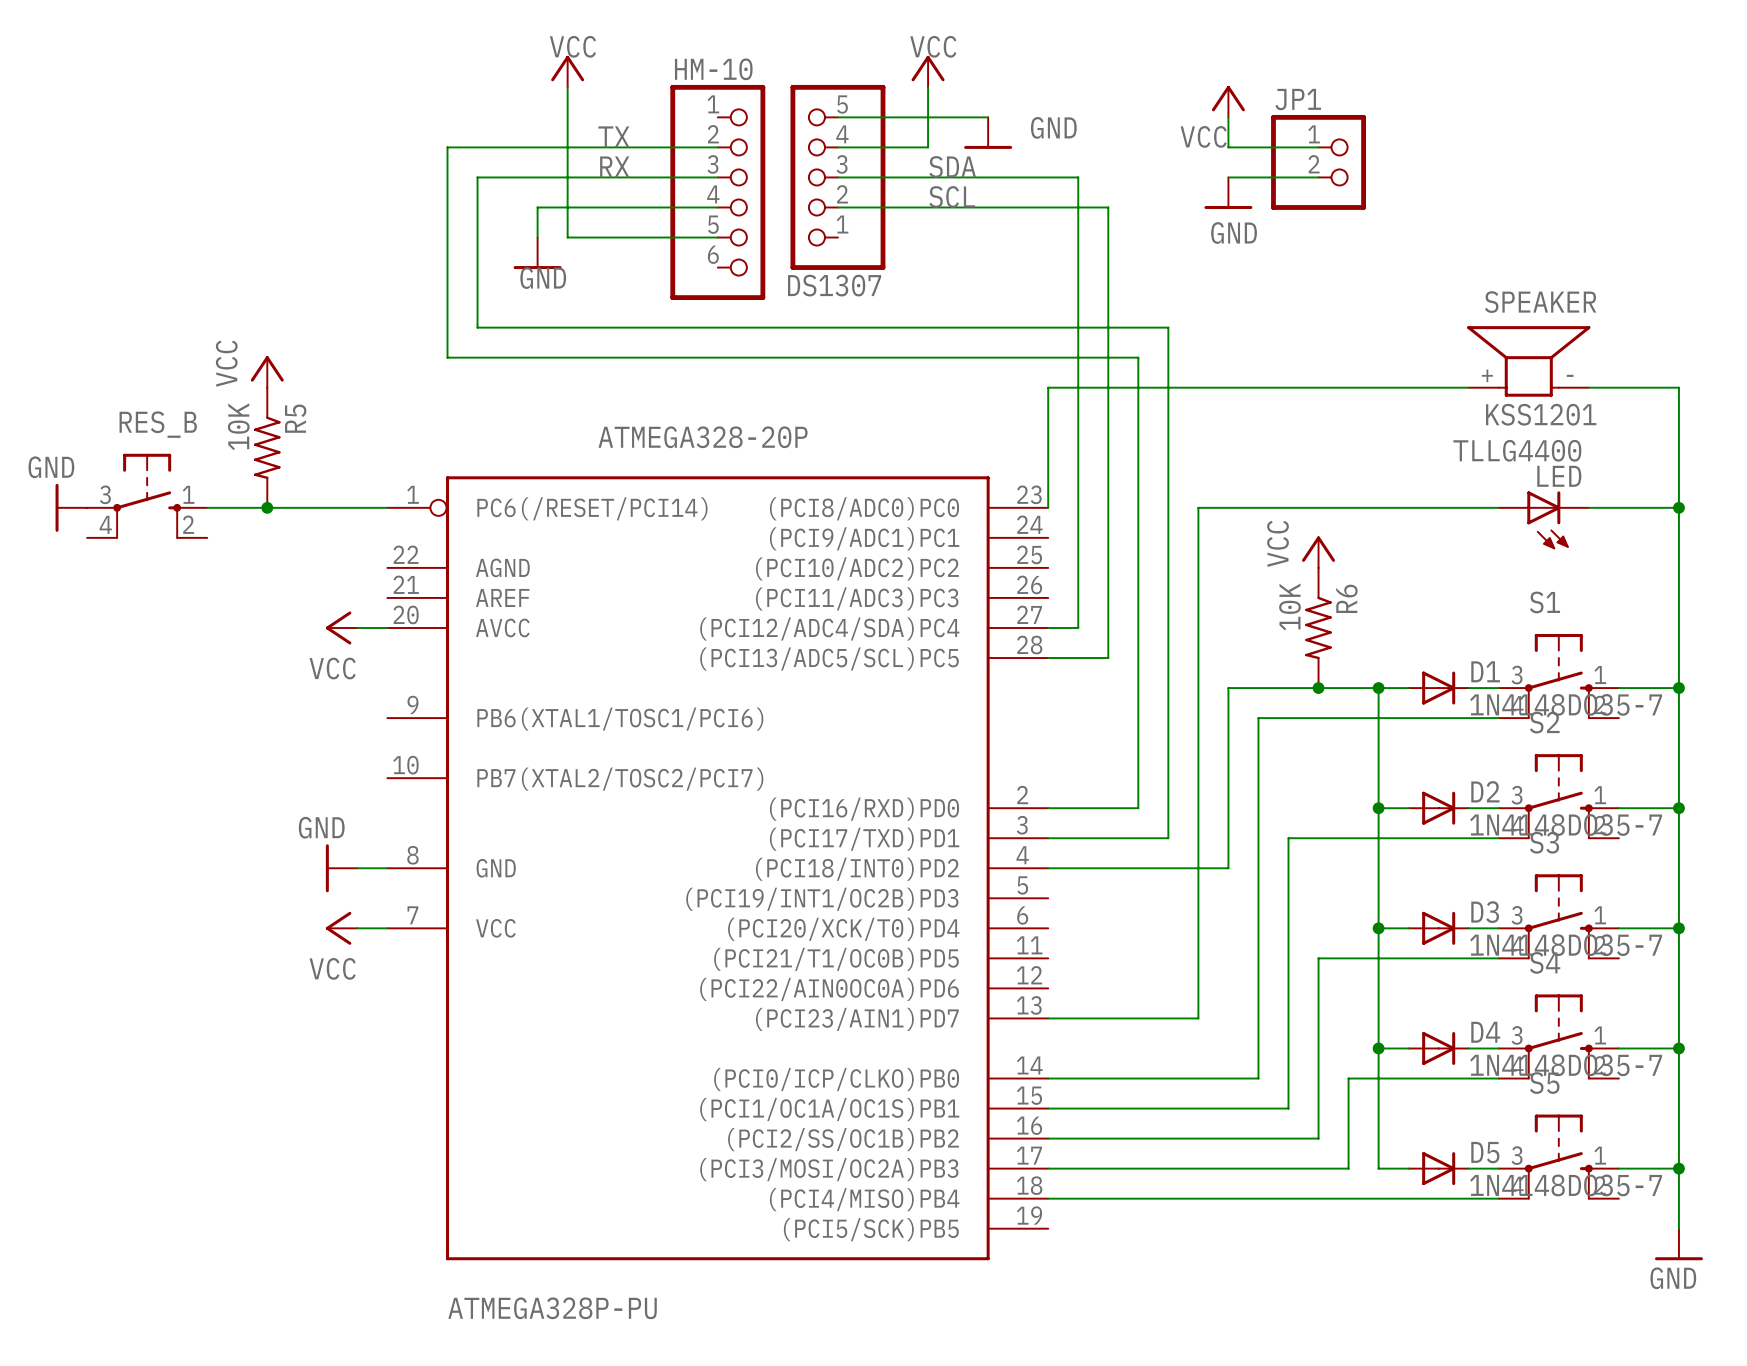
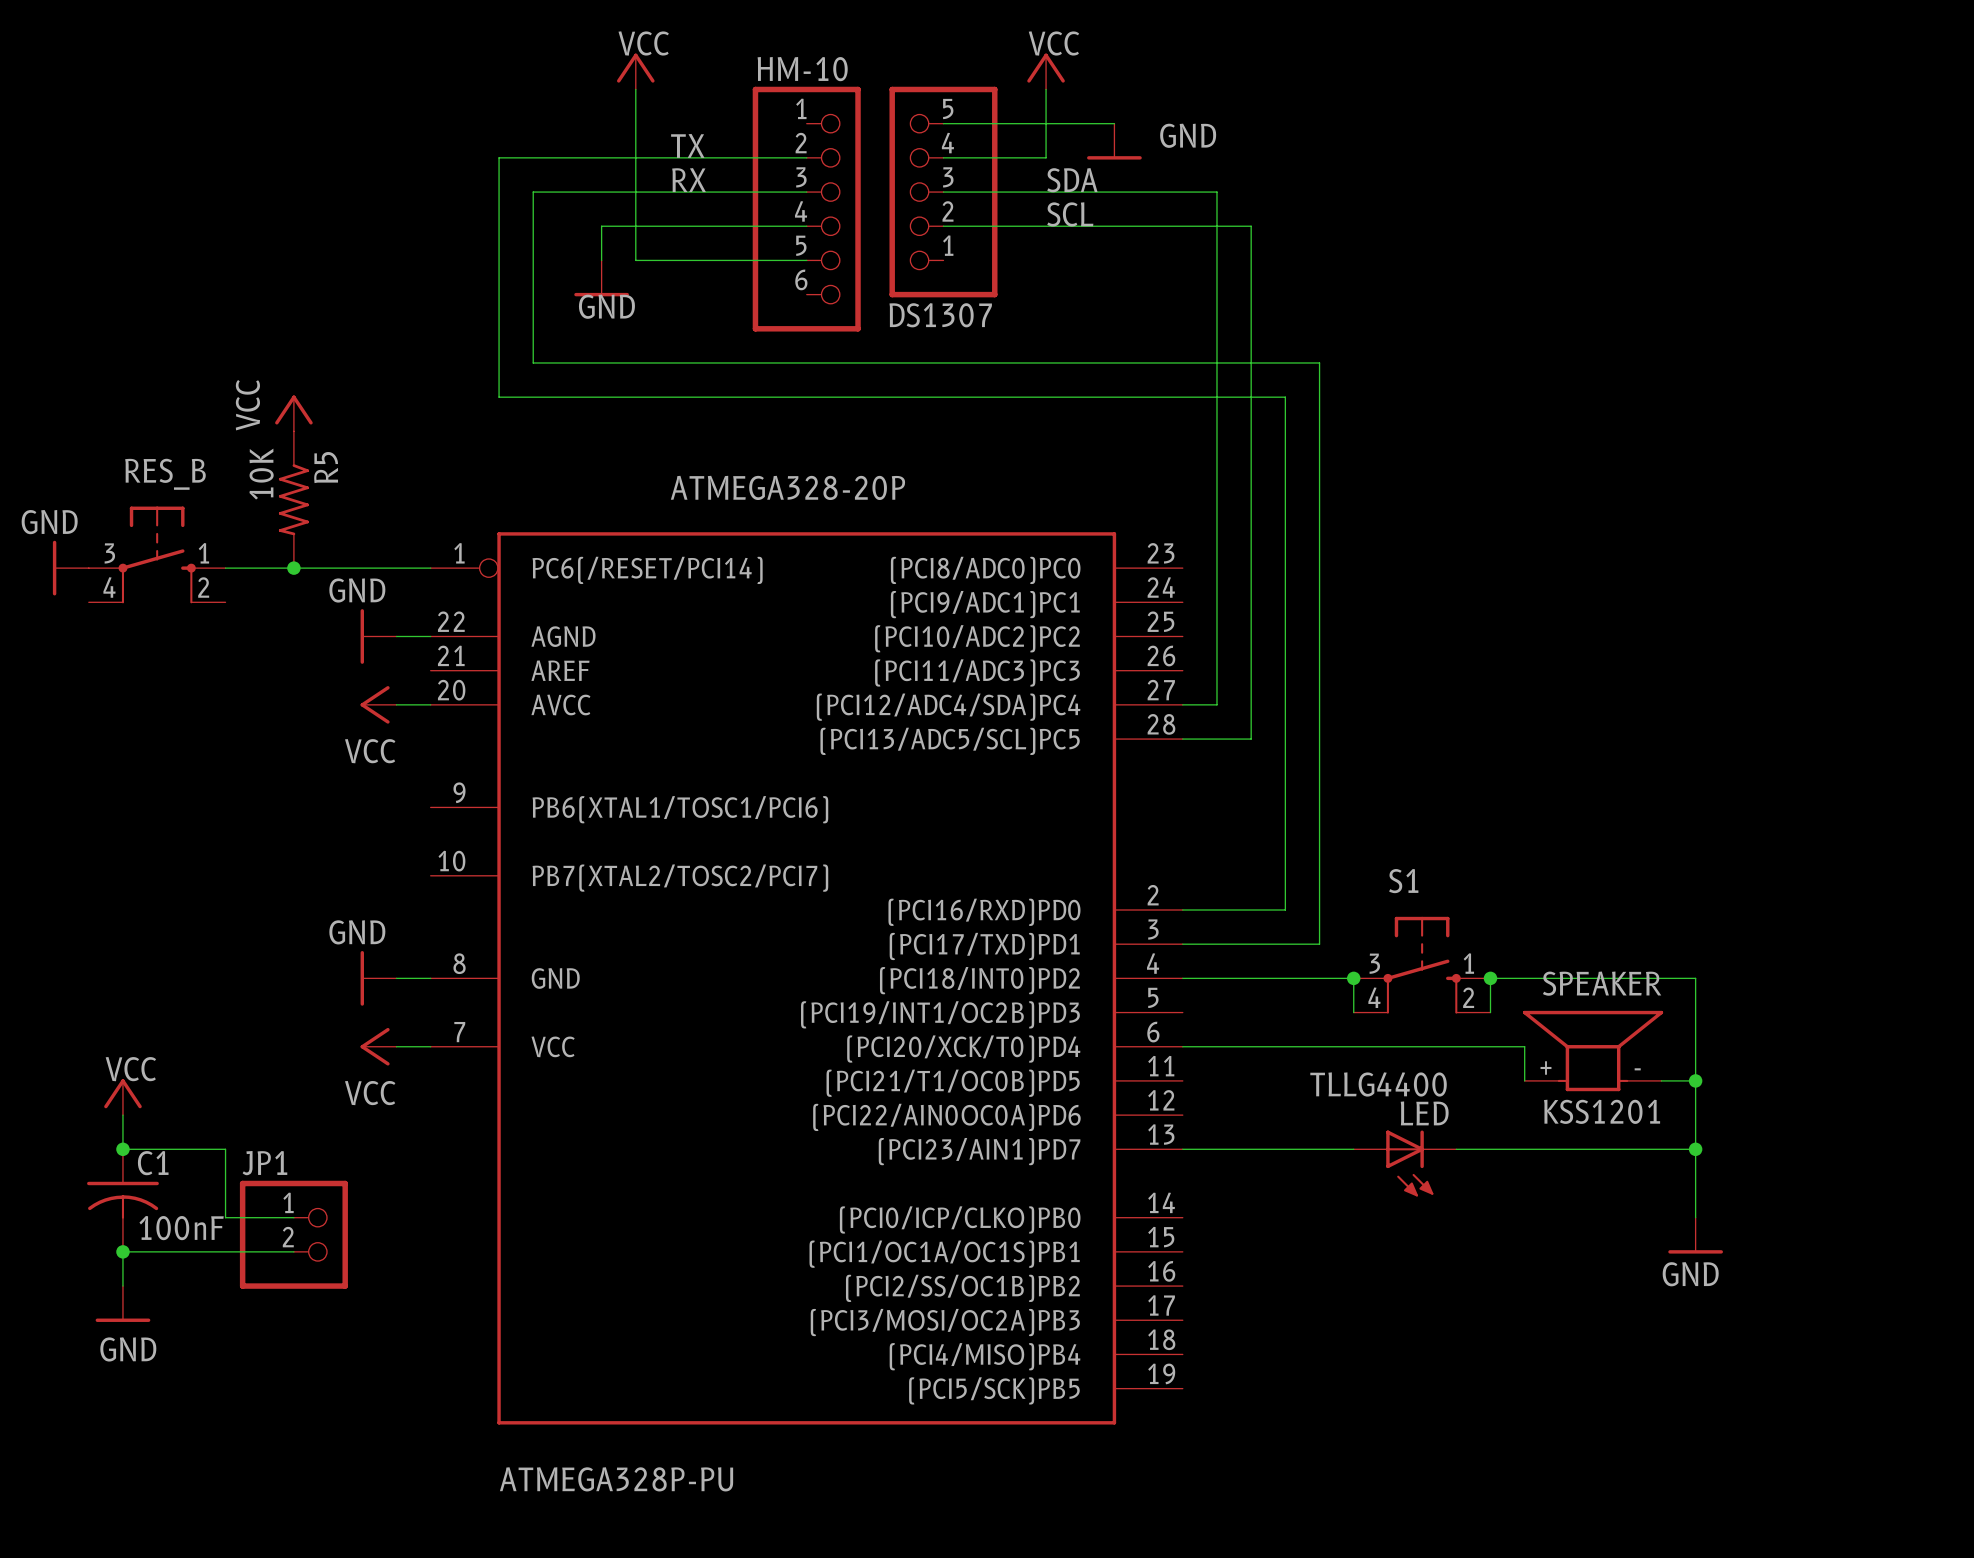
power symbol: VCC (1228, 101) -> none
wire: (1228, 117) (1228, 147) (1318, 147) -> none
JP1 position: (1318, 162) -> (293, 1234)
wire: (1228, 177) (1318, 177) -> none
power symbol: GND (1228, 193) -> none
SPEAKER: KSS1201 (1528, 361) -> none
wire: (1468, 387) (1048, 387) (1048, 507) -> none
wire: (1588, 387) (1678, 387) (1678, 1228) -> none
wire: (1498, 507) (1198, 507) (1198, 868) (1228, 868) (1228, 688) (1408, 688) -> none
wire: (1588, 507) (1678, 507) -> none
junction: (1678, 507) -> none
LED: TLLG4400 (1543, 520) -> none
power symbol: VCC (1318, 552) -> none
power symbol: none -> GND (378, 636)
wire: none -> (396, 636) (430, 636)
R6: 10K (1318, 627) -> none
S1 position: (1558, 676) -> (1422, 965)
junction: (1318, 688) -> none
wire: (1378, 688) (1378, 1168) (1408, 1168) -> none
junction: (1378, 688) -> none
D1: 1N4148DO35-7 (1438, 688) -> none
wire: (1468, 688) (1498, 688) -> none
wire: (1618, 688) (1678, 688) -> none
junction: (1678, 688) -> none
wire: (1498, 718) (1258, 718) (1258, 1078) (1048, 1078) -> none
S2: (1558, 796) -> none
wire: (1378, 808) (1408, 808) -> none
junction: (1378, 808) -> none
D2: 1N4148DO35-7 (1438, 808) -> none
wire: (1468, 808) (1498, 808) -> none
wire: (1618, 808) (1678, 808) -> none
junction: (1678, 808) -> none
wire: (1498, 838) (1288, 838) (1288, 1108) (1048, 1108) -> none
junction: none -> (1353, 978)
junction: none -> (1490, 978)
wire: (1198, 898) (1198, 1018) -> none
S3: (1558, 916) -> none
wire: none -> (1182, 1046) (1524, 1046) (1524, 1080)
junction: (1378, 928) -> none
D3: 1N4148DO35-7 (1438, 928) -> none
wire: (1468, 928) (1498, 928) -> none
wire: (1618, 928) (1678, 928) -> none
junction: (1678, 928) -> none
SPEAKER: none -> KSS1201 (1593, 1051)
wire: (1468, 958) (1318, 958) (1318, 1138) (1048, 1138) -> none
junction: none -> (1695, 1080)
power symbol: none -> VCC (122, 1097)
wire: none -> (122, 1115) (122, 1149) (225, 1149) (225, 1217) (293, 1217)
junction: none -> (122, 1149)
wire: none -> (1456, 1149) (1695, 1149)
junction: none -> (1695, 1149)
LED: none -> TLLG4400 (1405, 1163)
S4: (1558, 1036) -> none
wire: (1378, 1048) (1408, 1048) -> none
junction: (1378, 1048) -> none
D4: 1N4148DO35-7 (1438, 1048) -> none
wire: (1468, 1048) (1498, 1048) -> none
wire: (1618, 1048) (1678, 1048) -> none
junction: (1678, 1048) -> none
C1: none -> 100nF (122, 1200)
wire: (1498, 1078) (1348, 1078) (1348, 1168) (1048, 1168) -> (1695, 1217) (1695, 978) (1490, 978) (1490, 1012)
junction: none -> (122, 1251)
wire: none -> (293, 1251) (122, 1251) (122, 1286)
power symbol: none -> GND (122, 1304)
S5: (1558, 1157) -> none
D5: 1N4148DO35-7 (1438, 1168) -> none
wire: (1468, 1168) (1498, 1168) -> none
wire: (1618, 1168) (1678, 1168) -> none
junction: (1678, 1168) -> none
wire: (1048, 1198) (1498, 1198) -> none
power symbol position: GND (1678, 1244) -> GND (1695, 1235)

